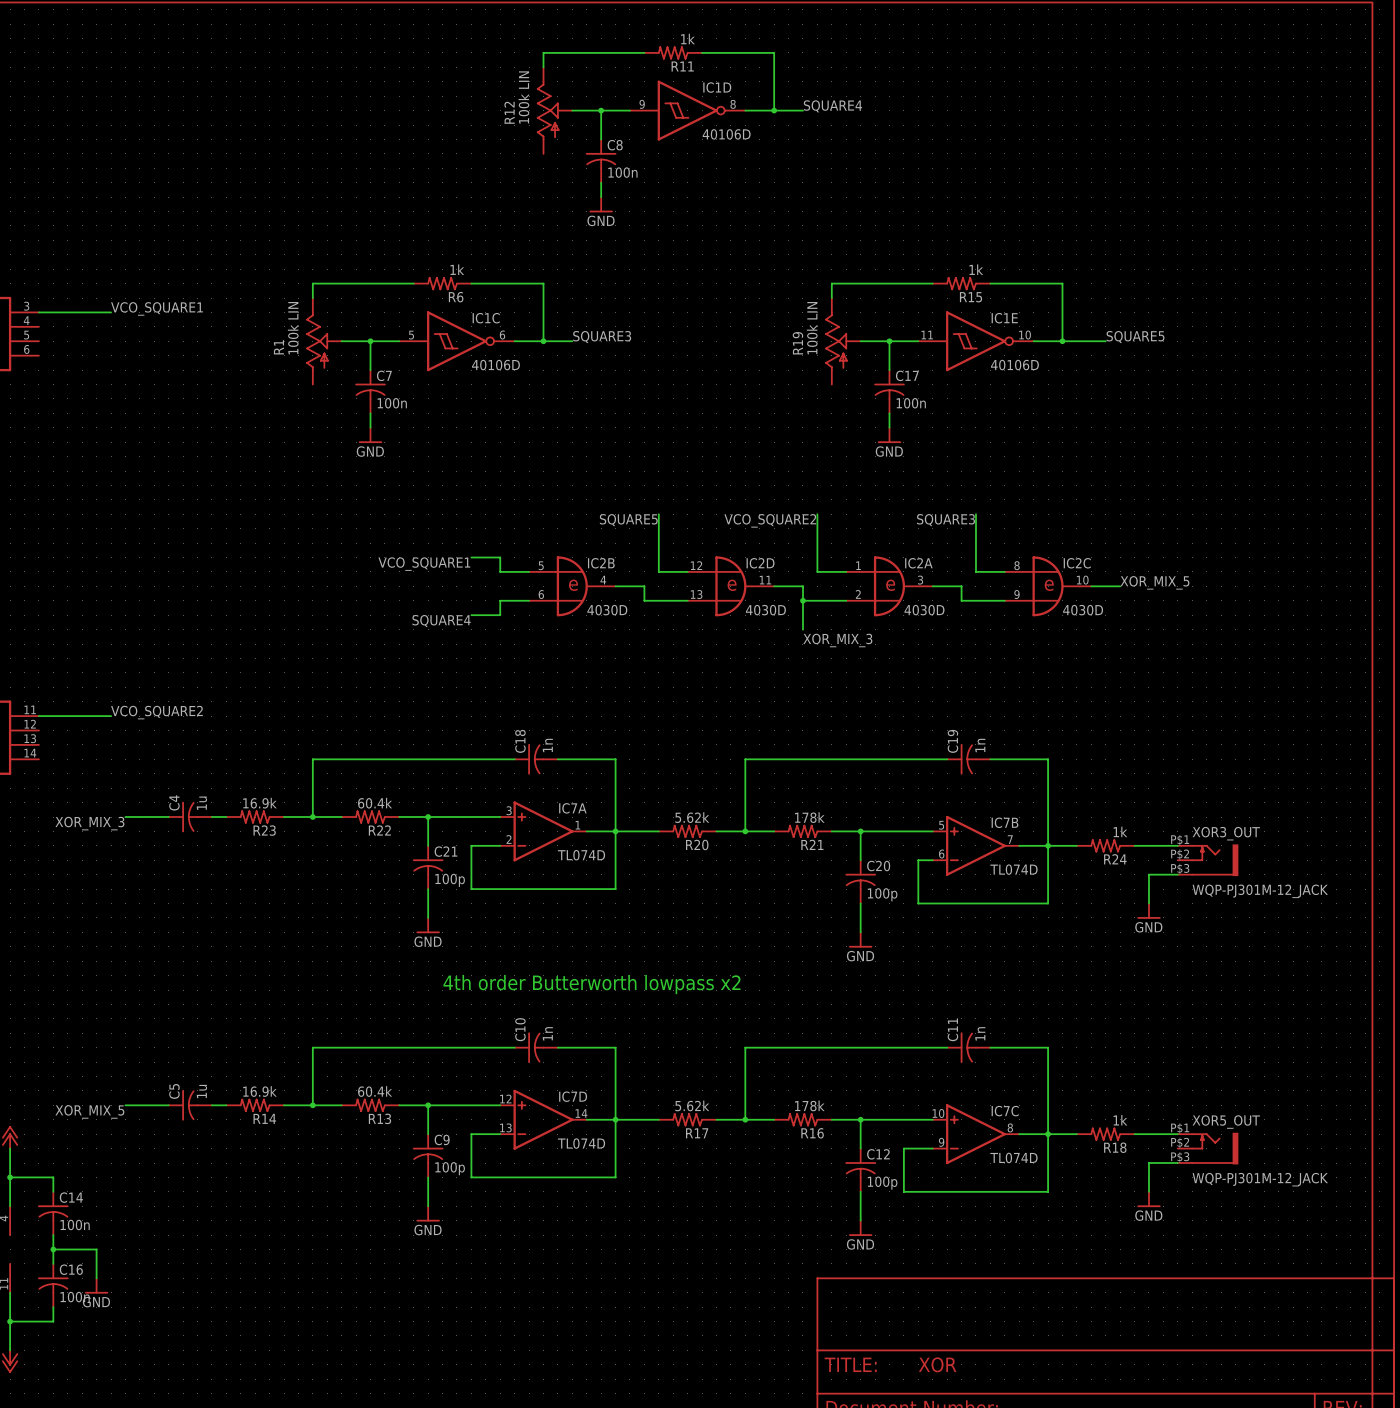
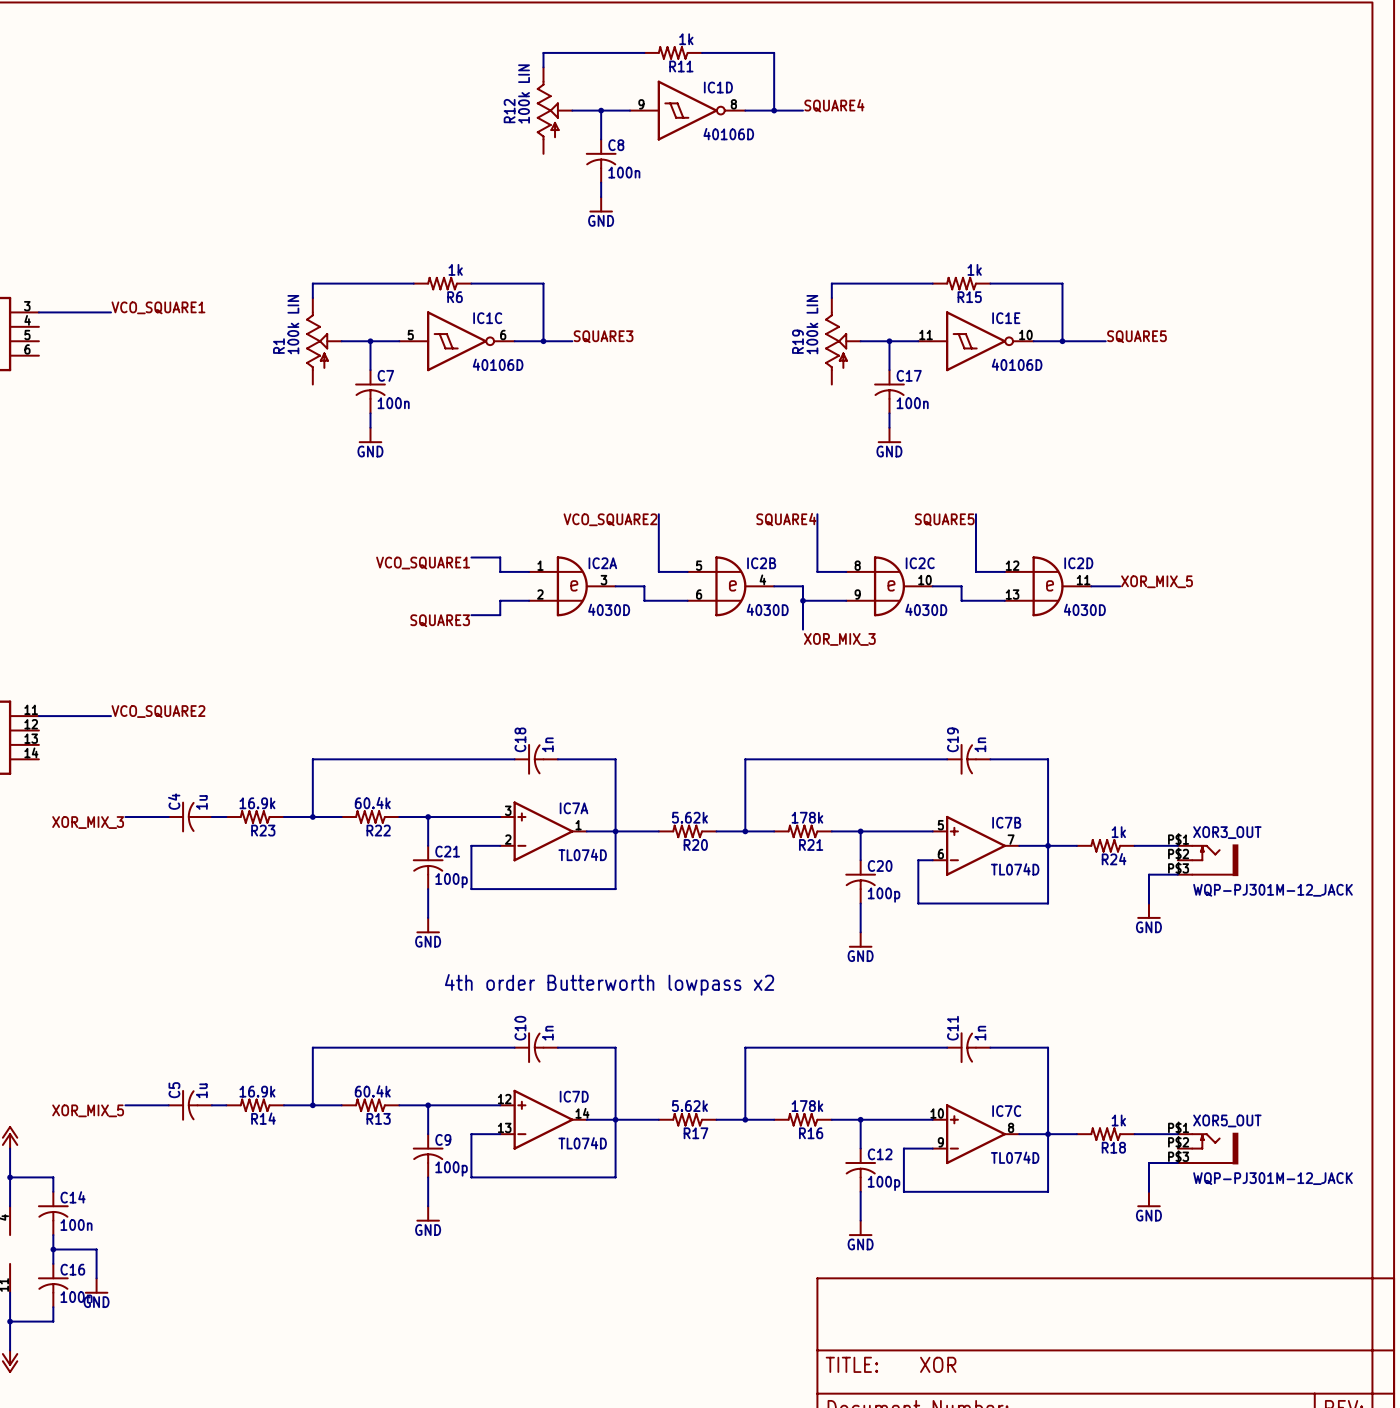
label: SQUARE5 (628, 520) -> VCO_SQUARE2 (610, 519)
label: VCO_SQUARE2 (770, 520) -> SQUARE4 (786, 519)
label: SQUARE3 (946, 520) -> SQUARE5 (944, 519)
IC2B position: (572, 586) -> (730, 586)
IC2D position: (730, 586) -> (1048, 586)
IC2A position: (889, 586) -> (572, 586)
IC2C position: (1048, 586) -> (889, 586)
label: SQUARE4 (441, 621) -> SQUARE3 (440, 620)

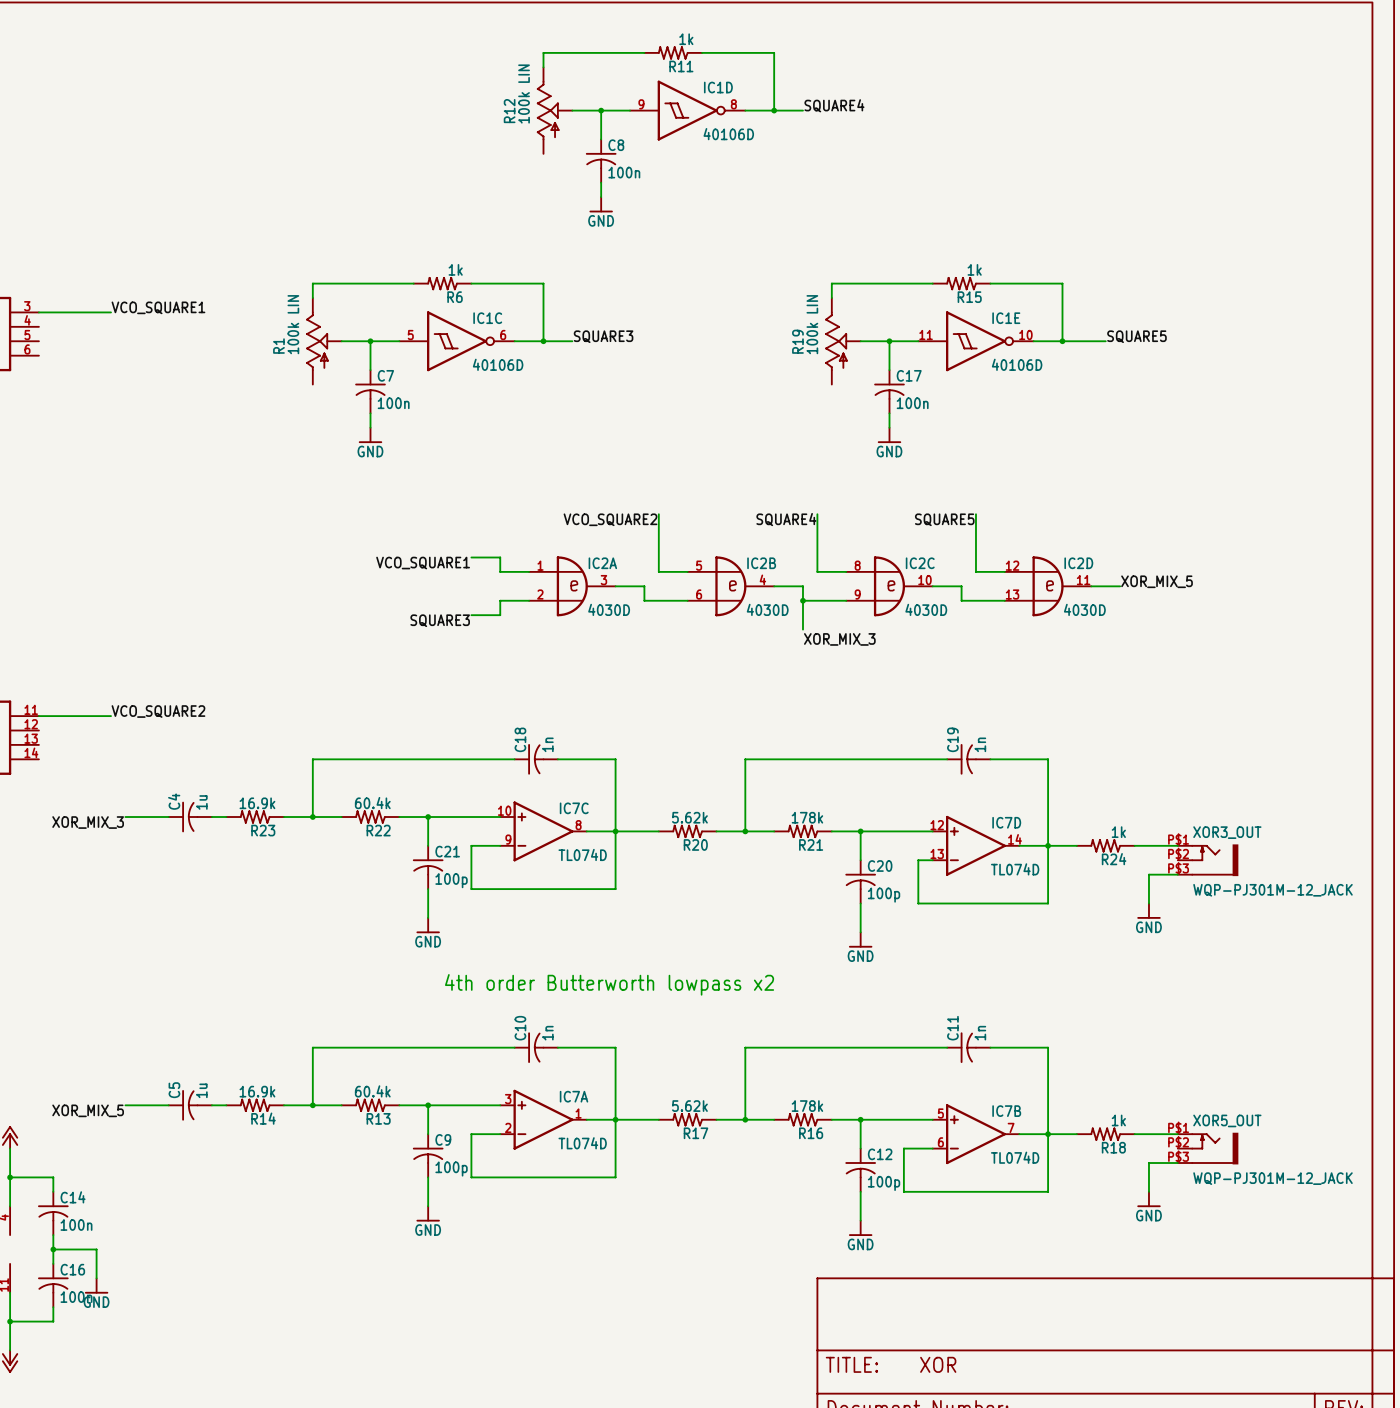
IC7A position: (543, 831) -> (543, 1119)
IC7B position: (975, 845) -> (975, 1134)
IC7D position: (543, 1119) -> (975, 845)
IC7C position: (975, 1134) -> (543, 831)

